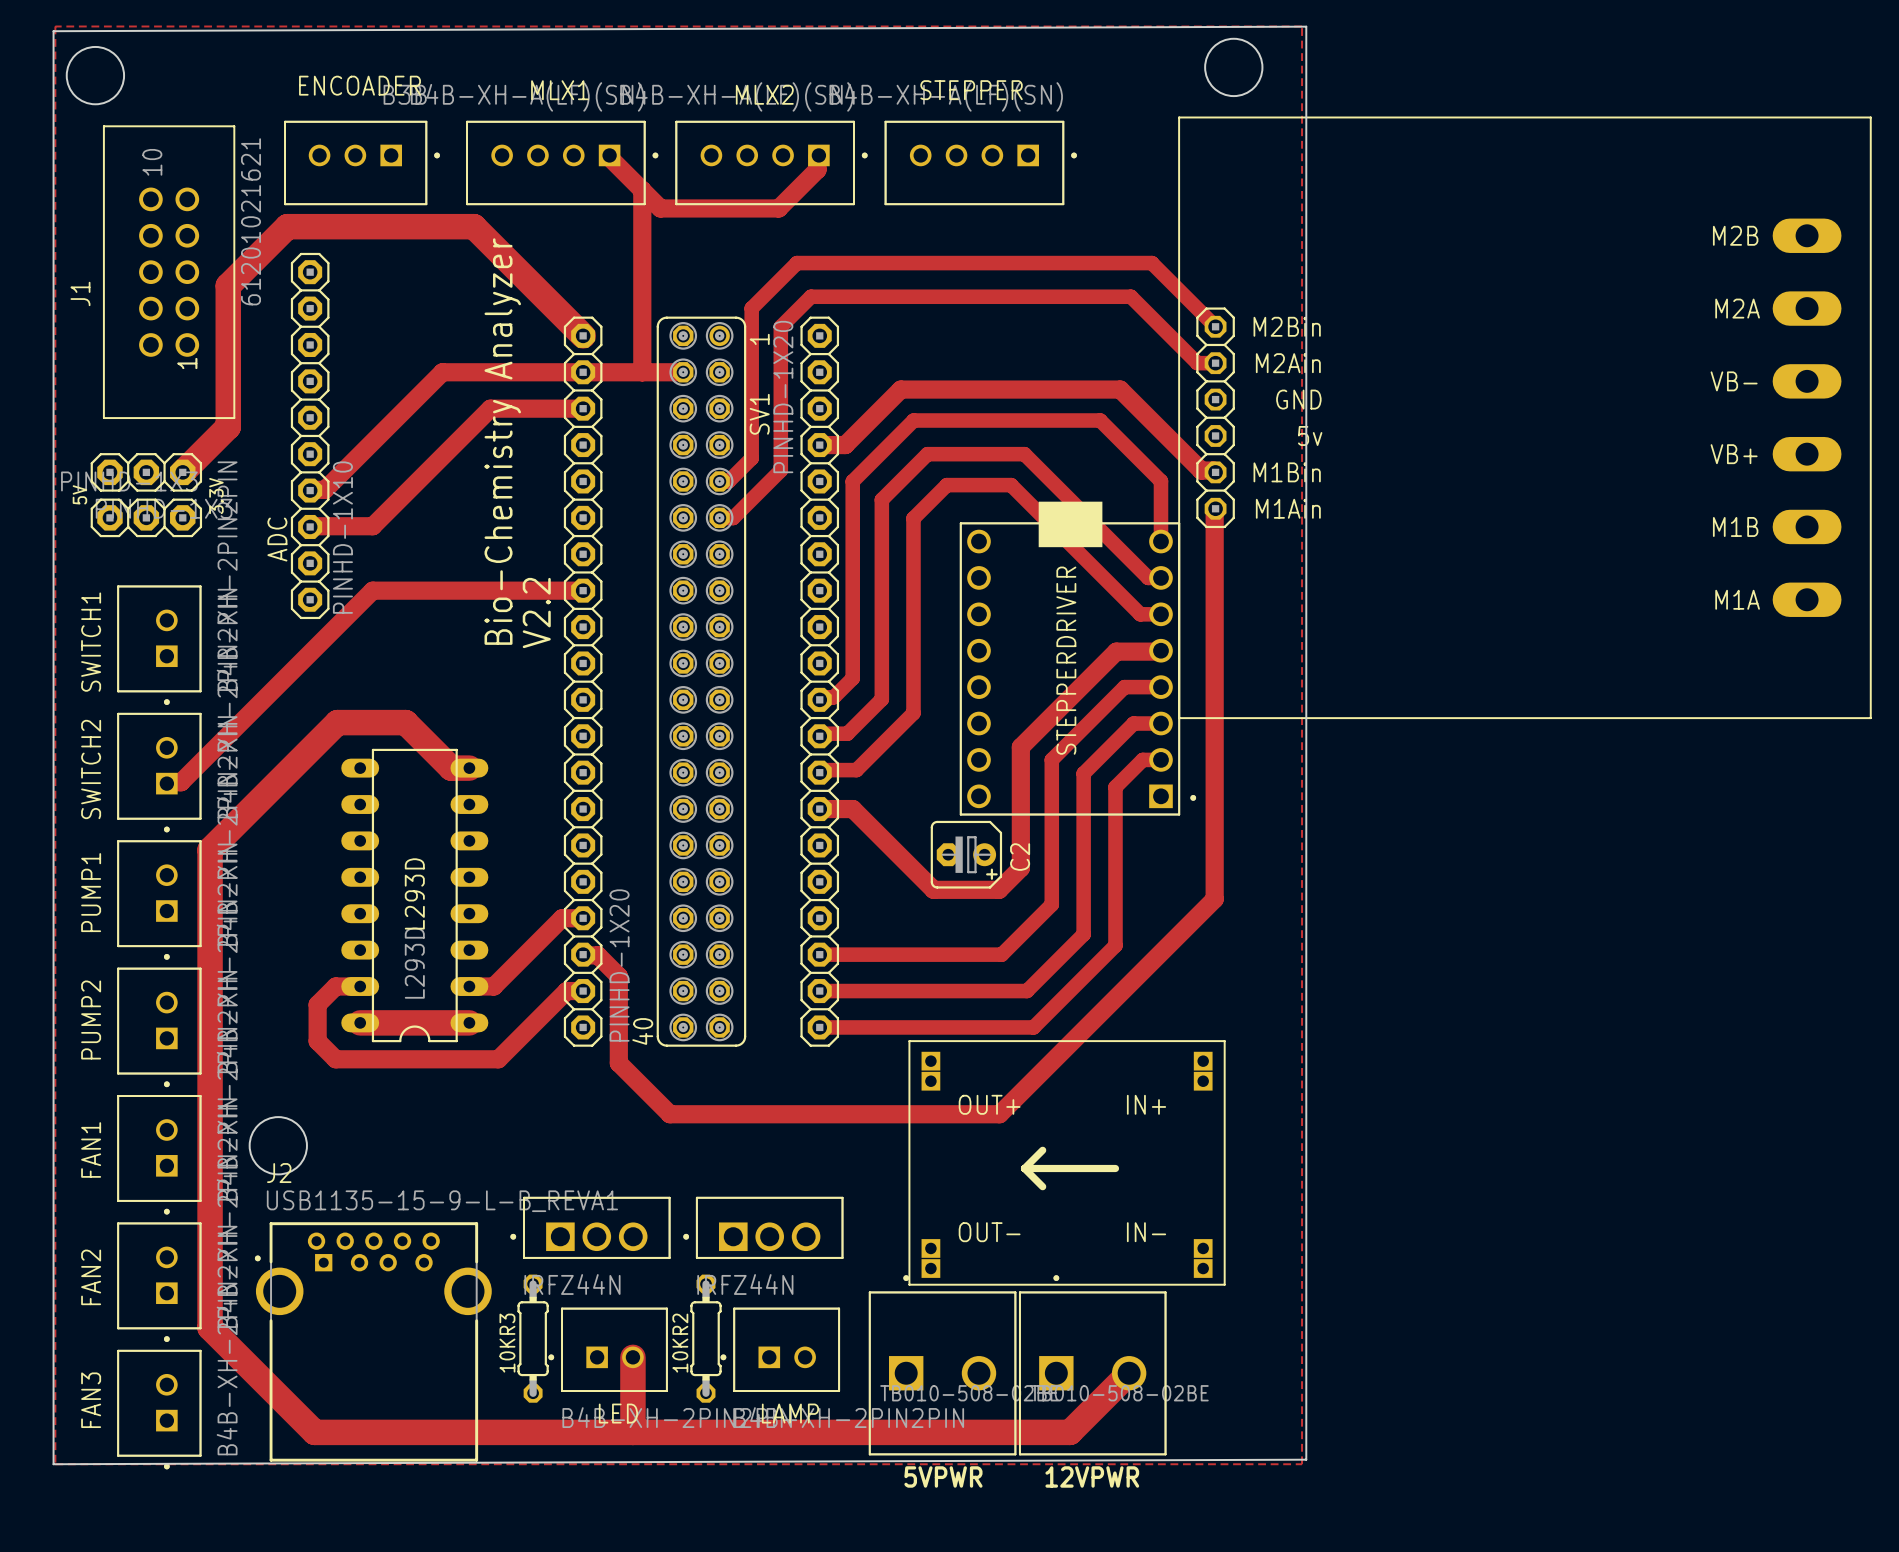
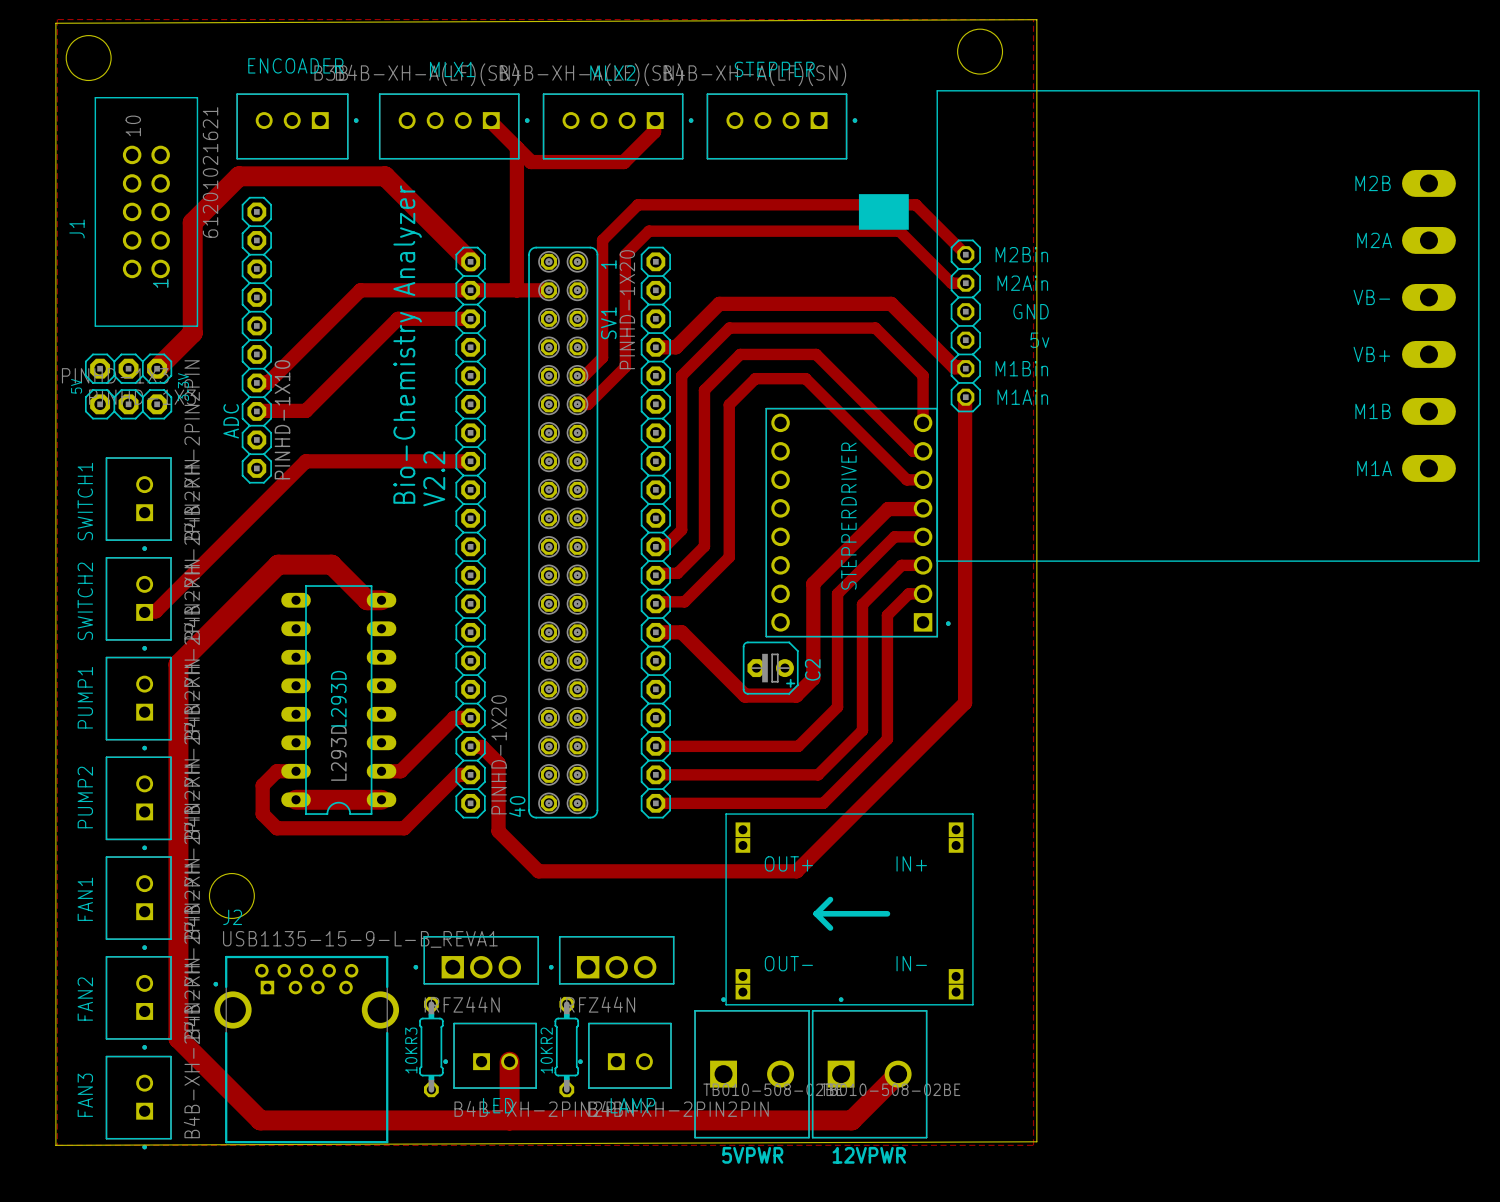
drawing position: (1070, 524) -> (883, 211)

